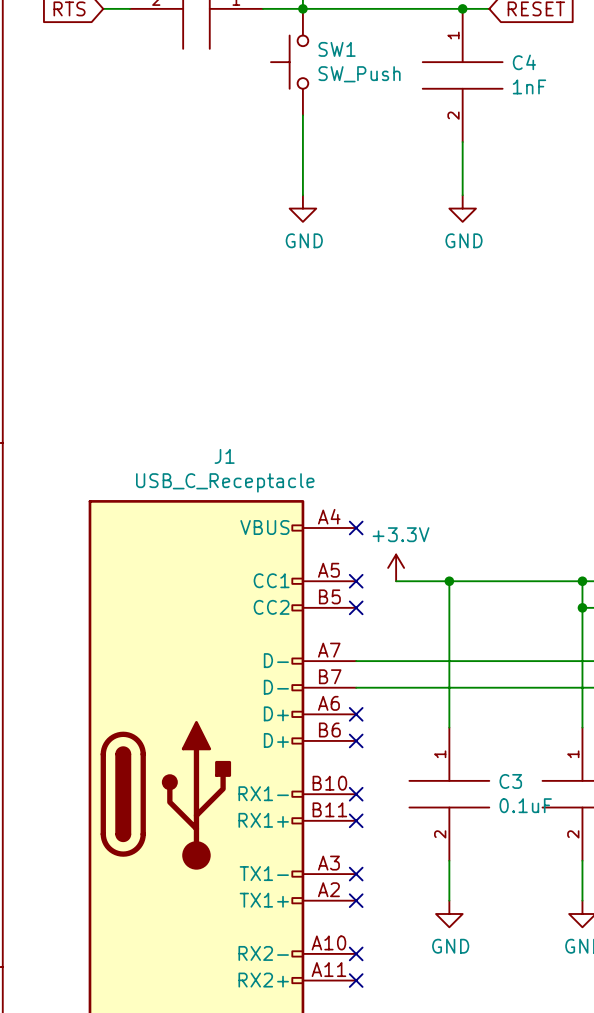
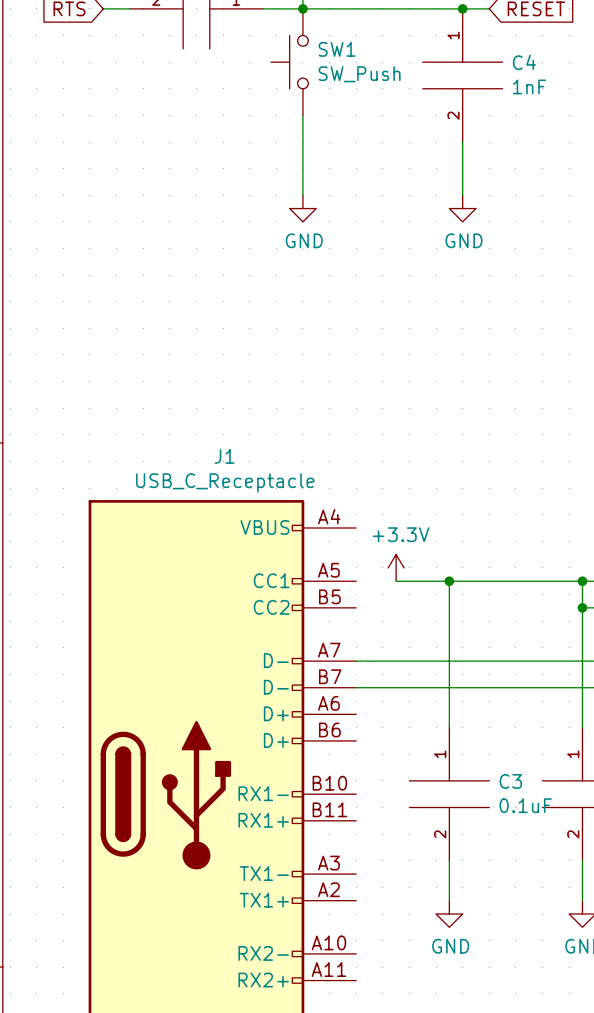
no-connect mark: (356, 528) -> none
no-connect mark: (356, 581) -> none
no-connect mark: (356, 607) -> none
no-connect mark: (356, 714) -> none
no-connect mark: (356, 740) -> none
no-connect mark: (356, 794) -> none
no-connect mark: (356, 820) -> none
no-connect mark: (356, 874) -> none
no-connect mark: (356, 900) -> none
no-connect mark: (356, 953) -> none
no-connect mark: (356, 980) -> none

